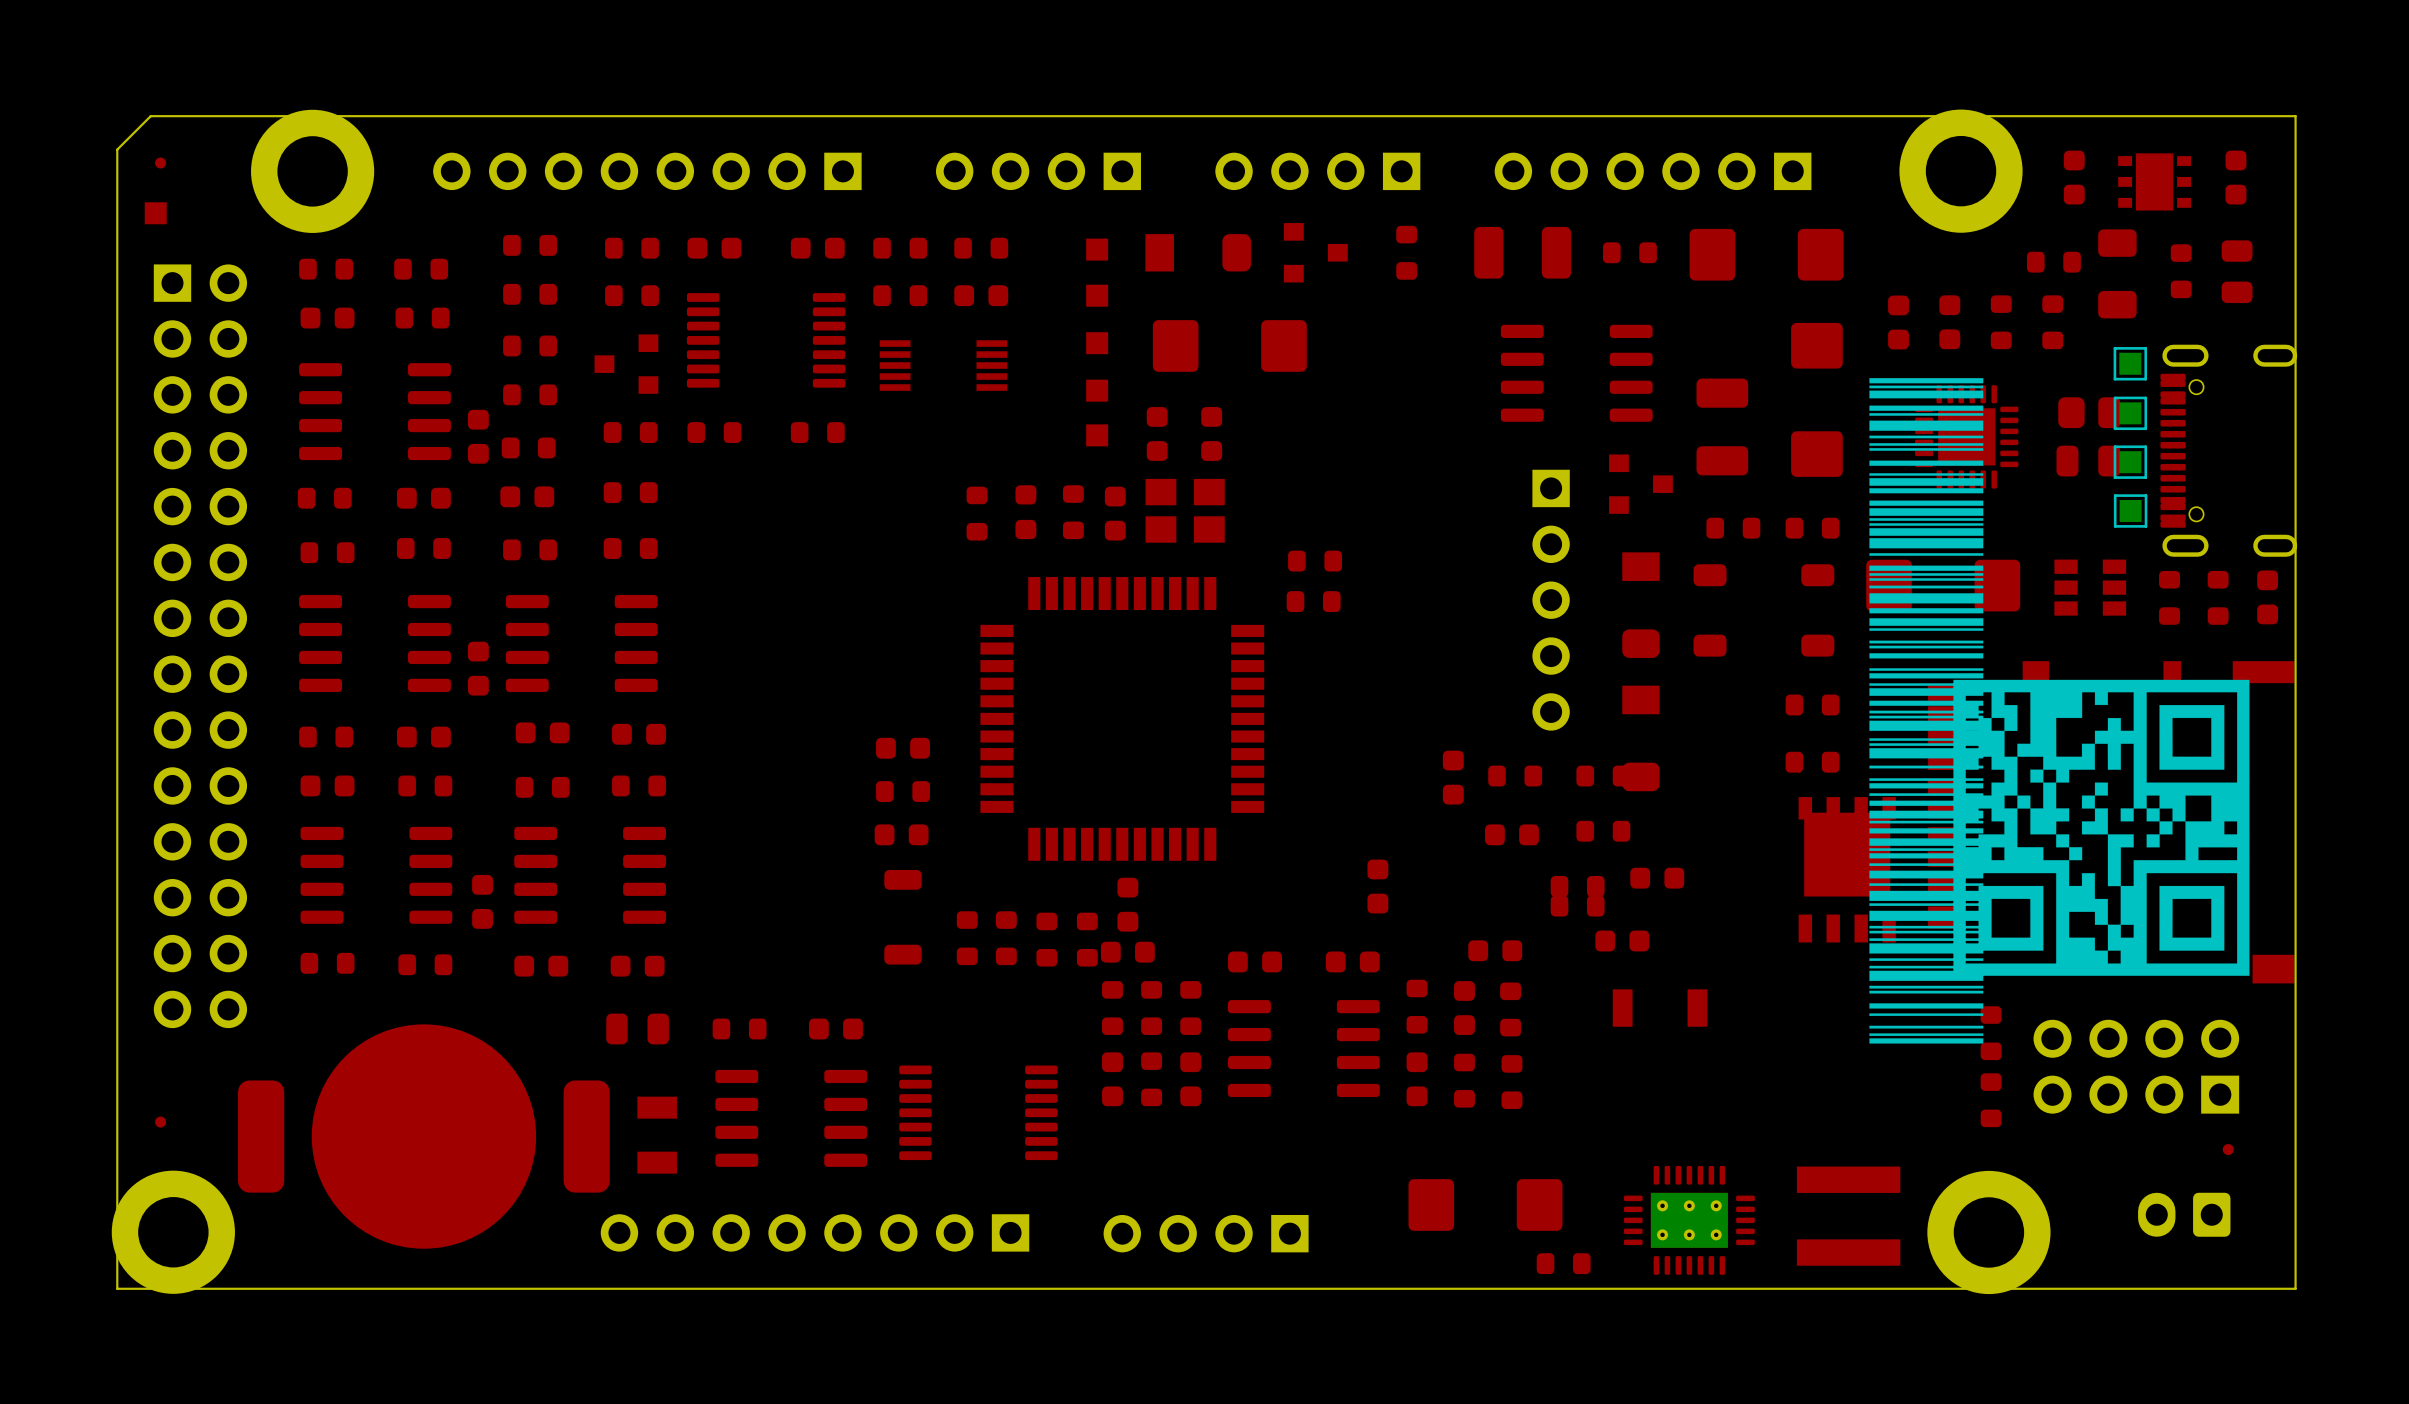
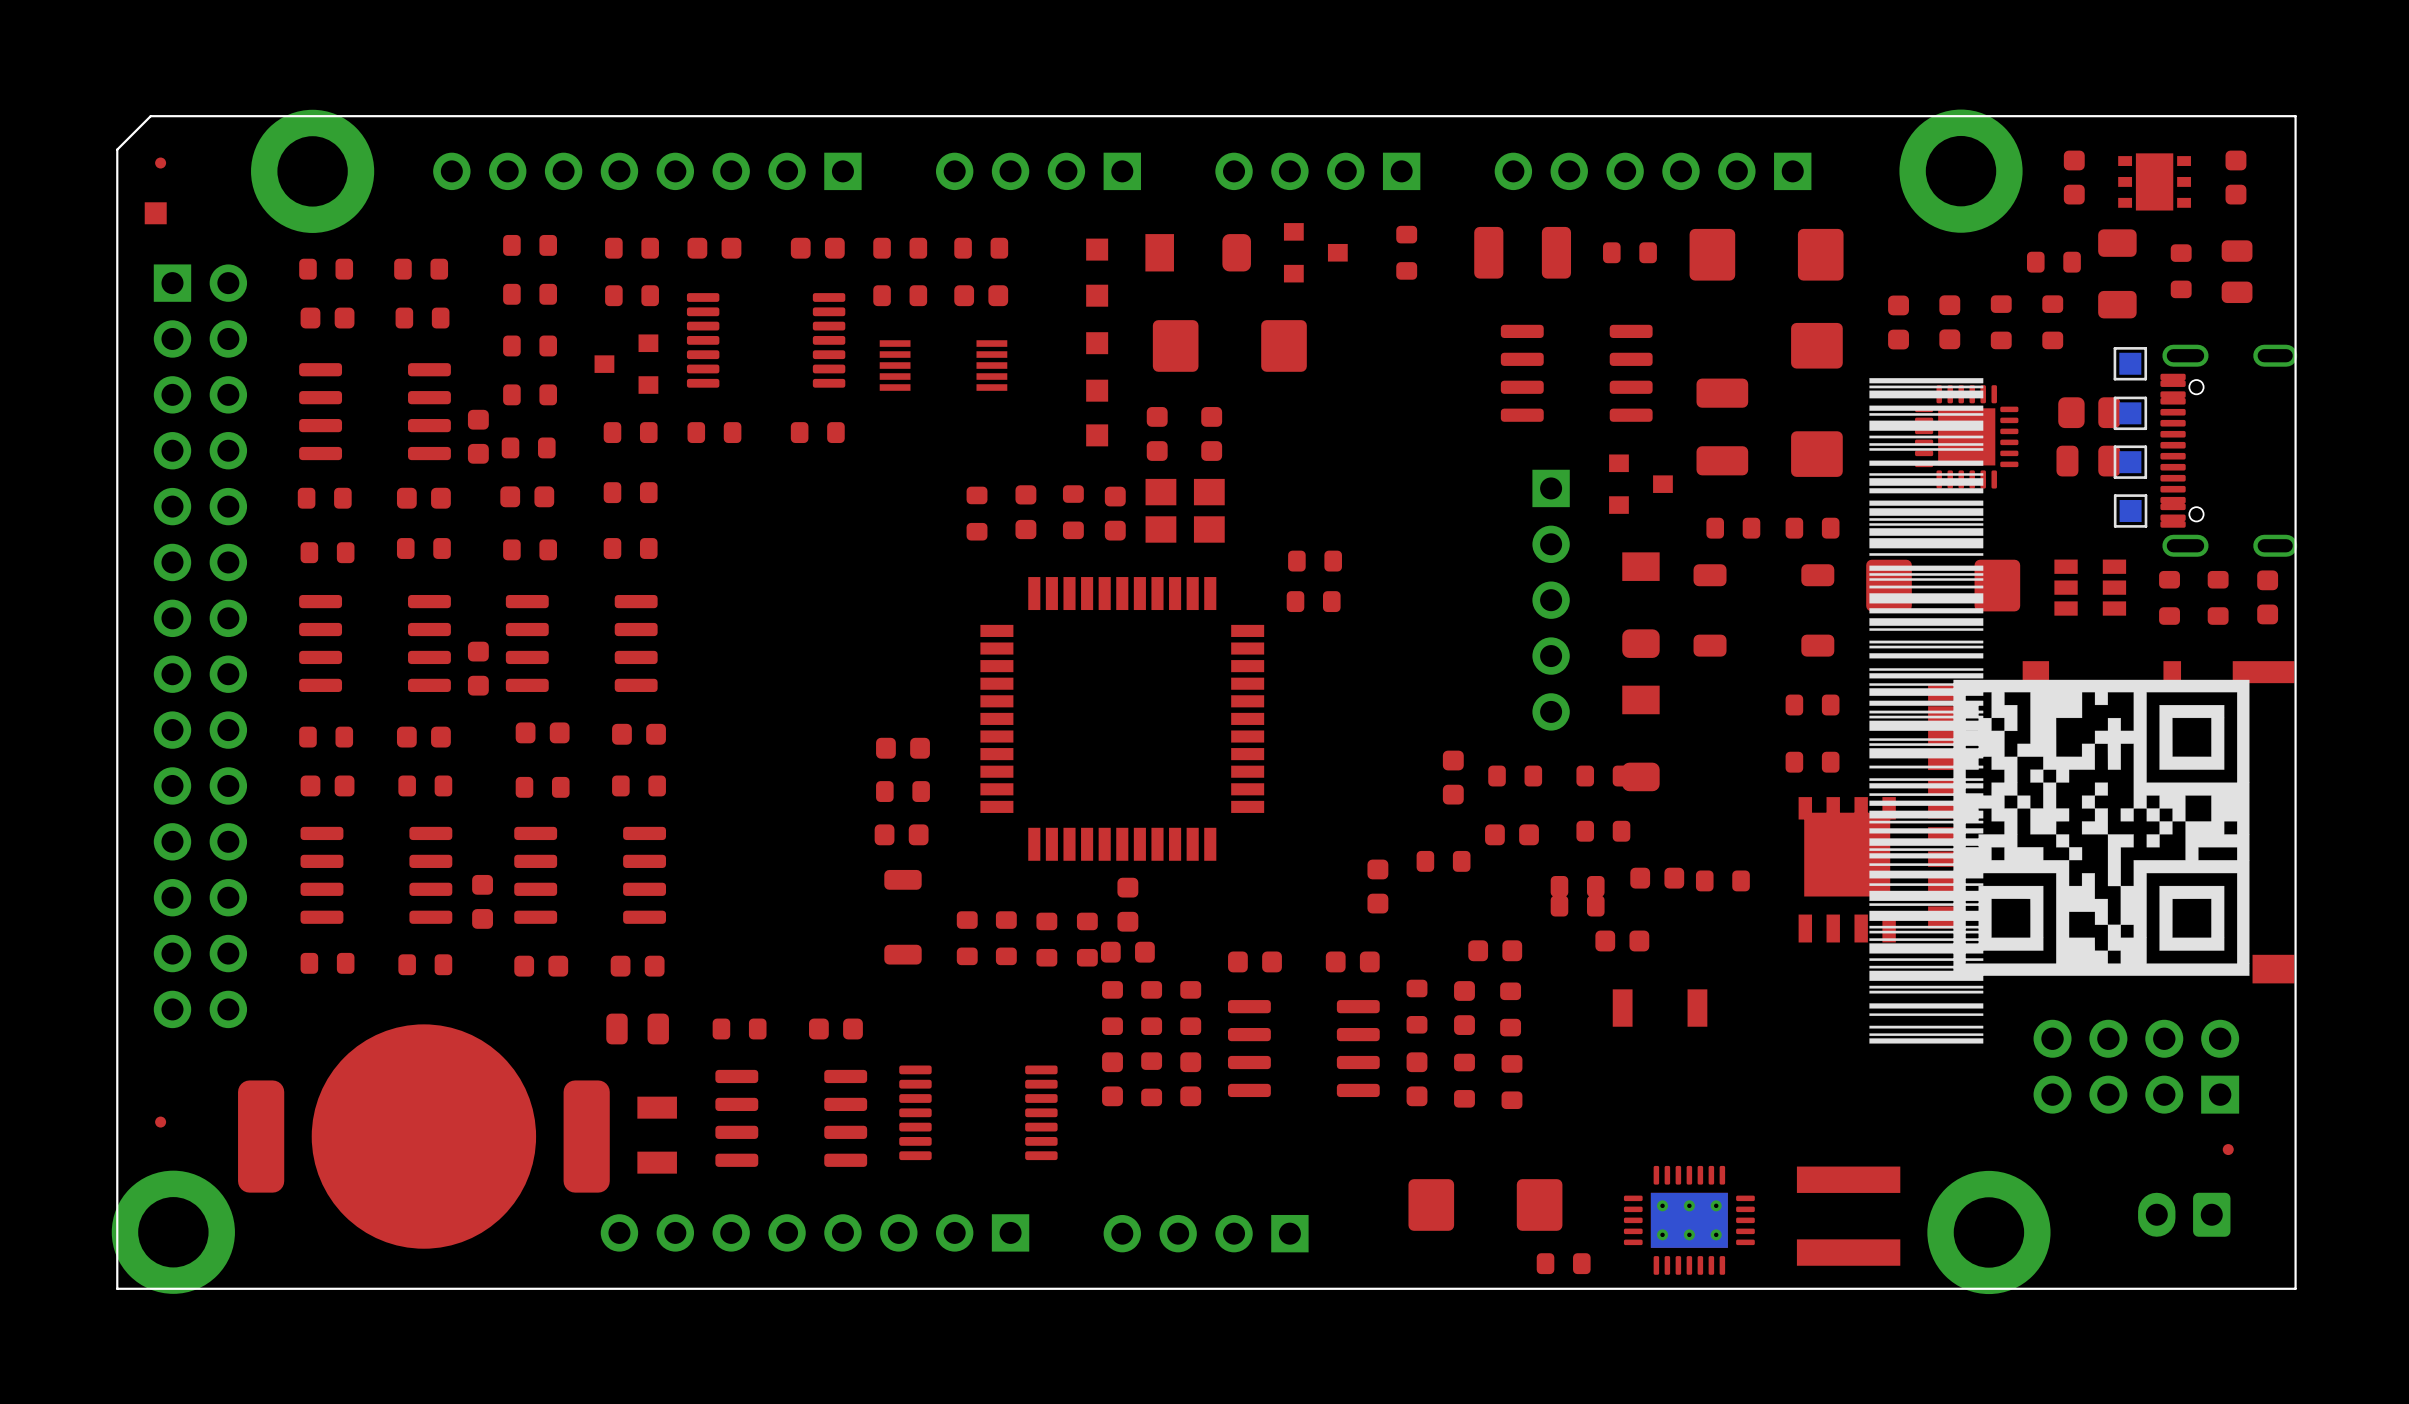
part: none -> (1443, 861)
part: none -> (1722, 880)
part: (1991, 1033) -> none
part: (1991, 1100) -> none

